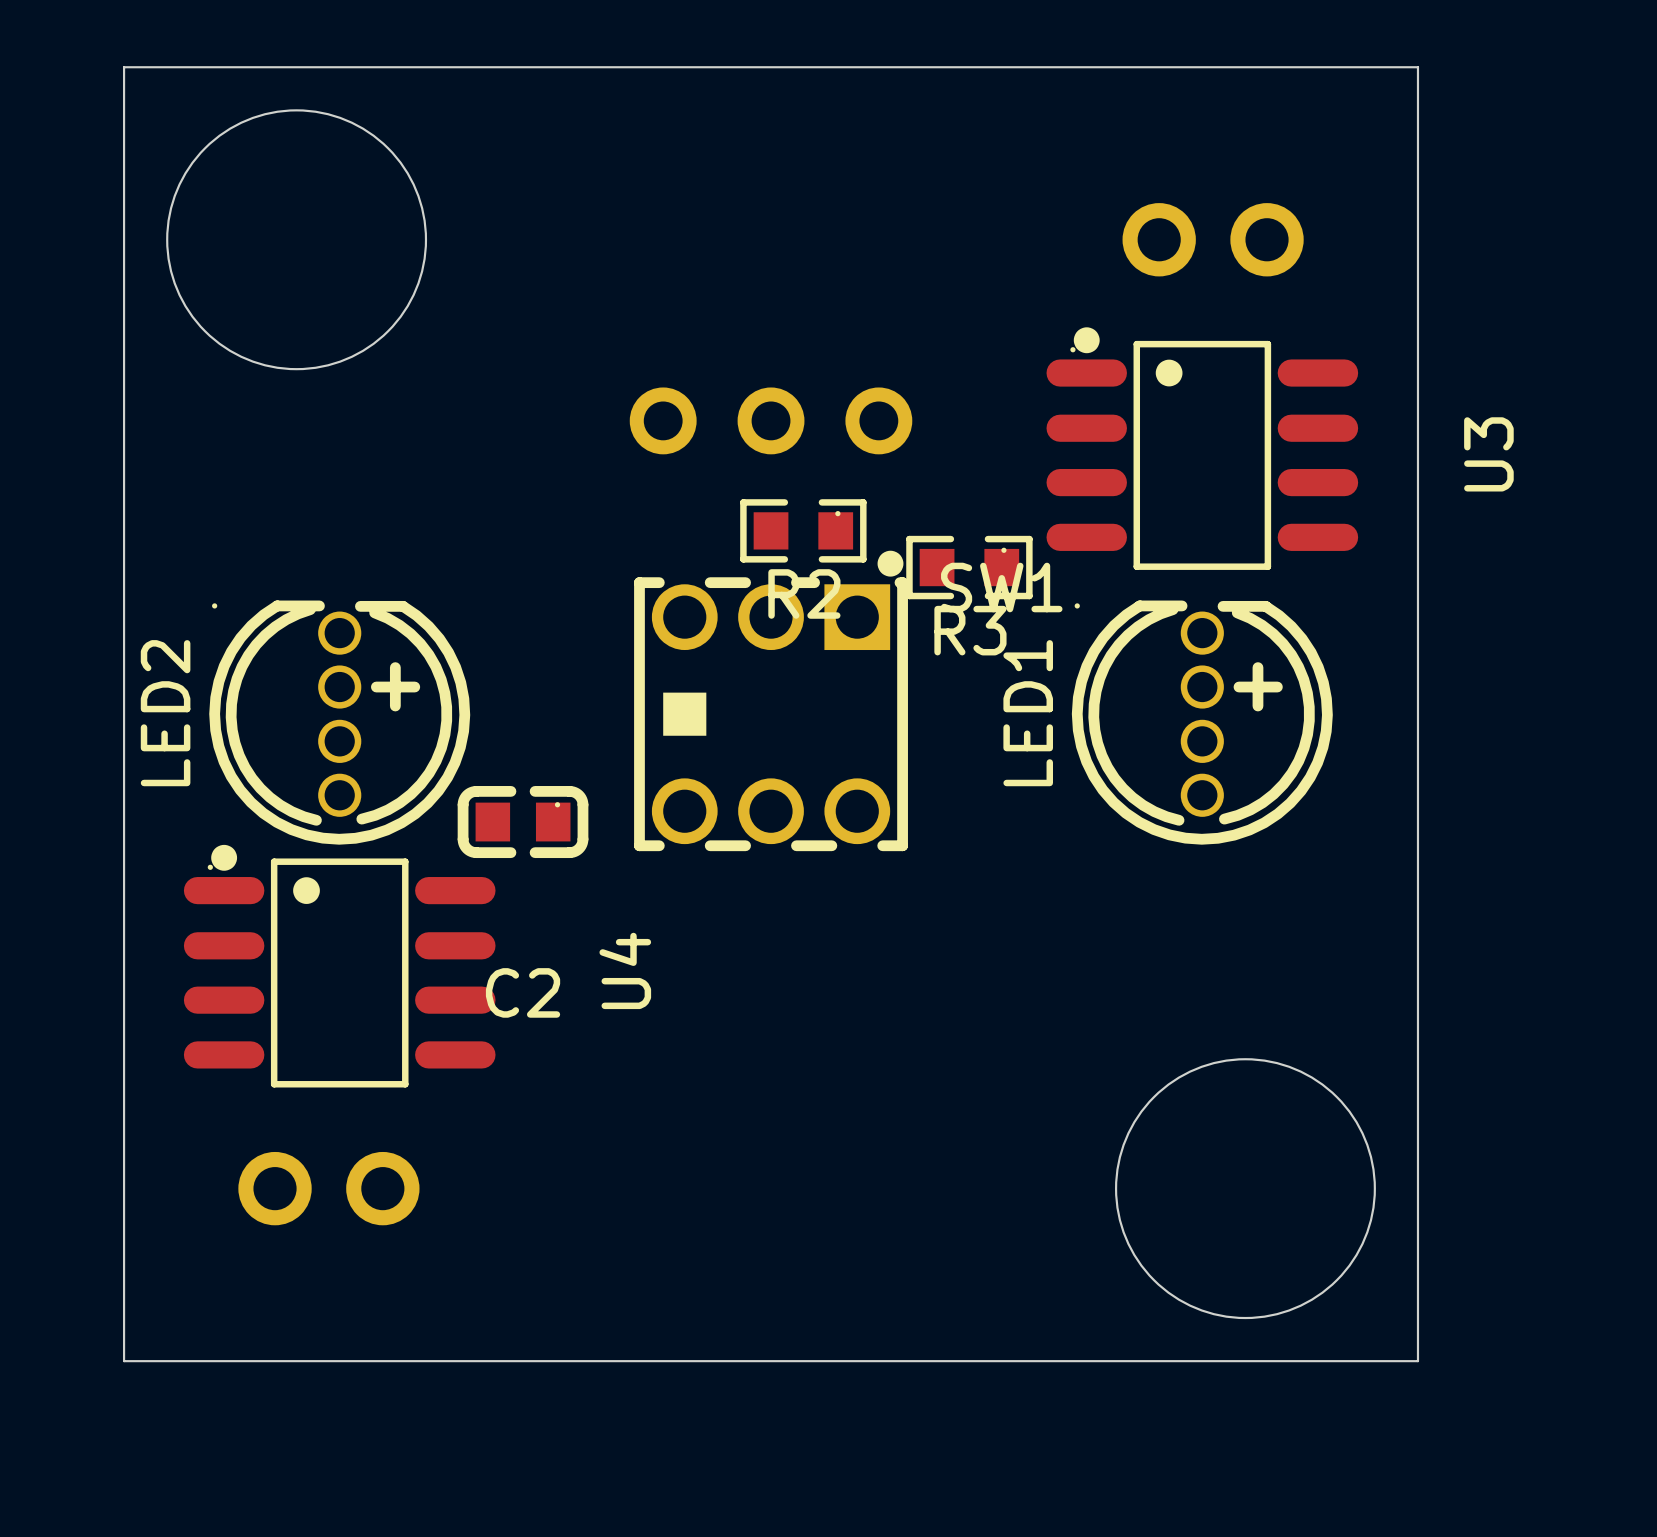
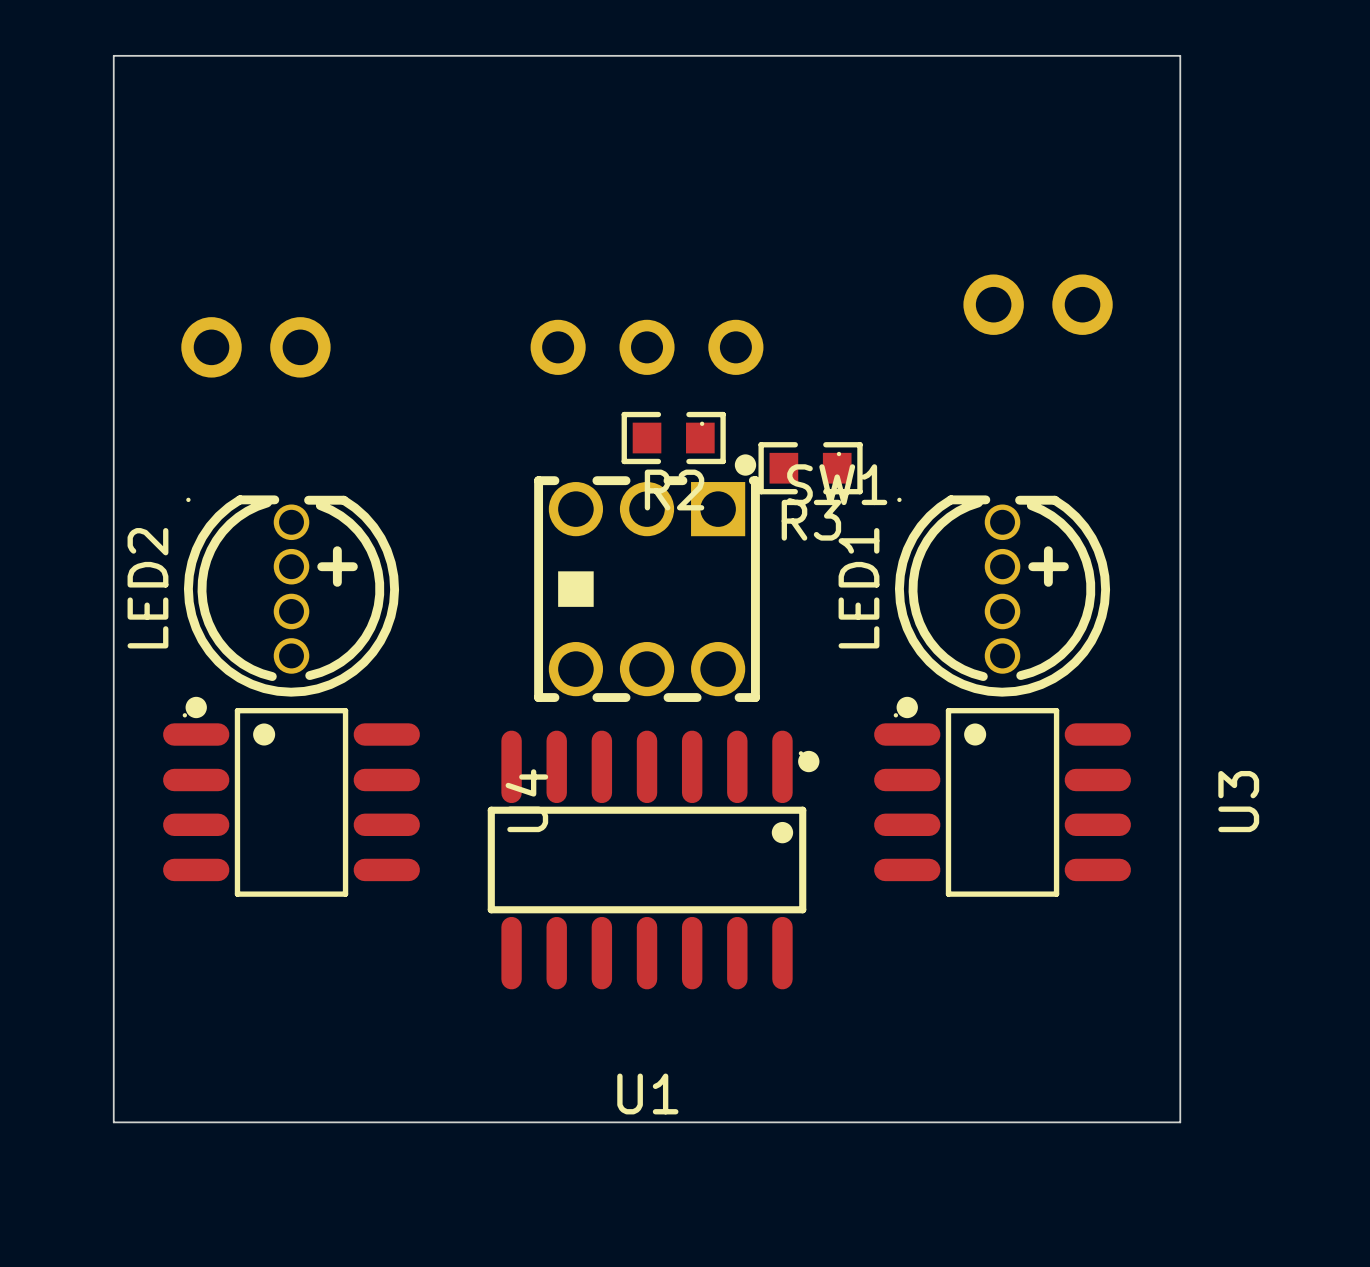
round board edge: [166, 109, 428, 371] -> none
part position: (1213, 239) -> (1038, 304)
part: none -> (255, 347)
U3 position: (1202, 448) -> (1002, 796)
C2: (523, 822) -> none
U1: none -> (653, 860)
round board edge: [1114, 1058, 1376, 1320] -> none
part: (328, 1188) -> none

